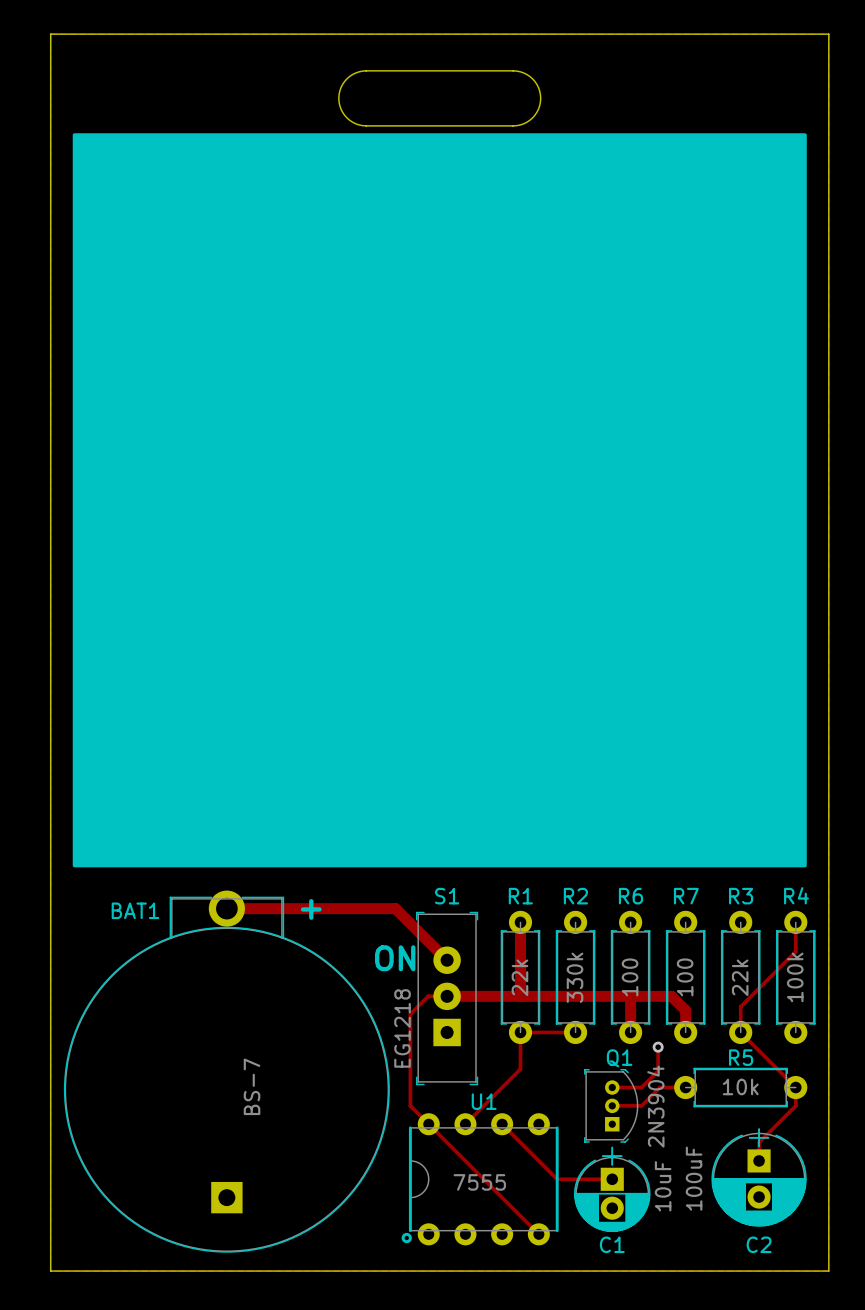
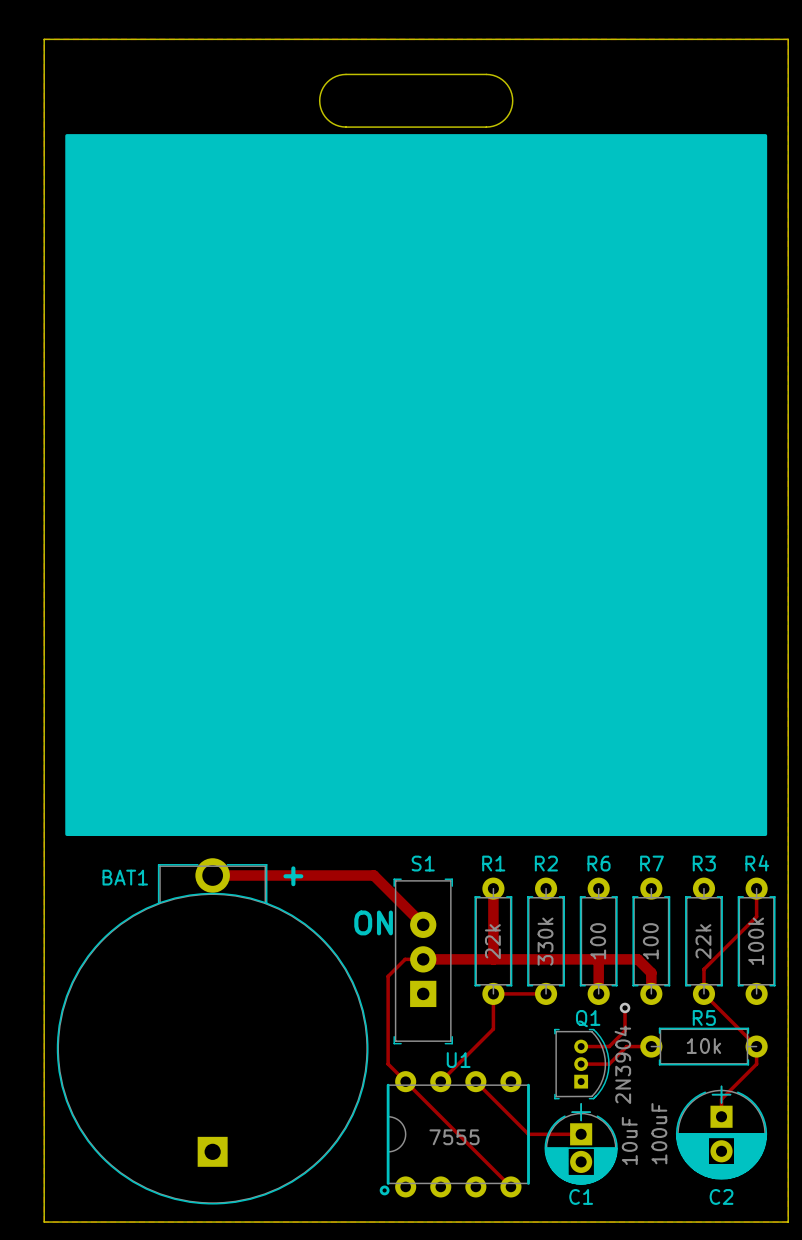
S1 value: EG1218 (402, 1028) -> none
line: none -> (596, 1032) (606, 1047) (608, 1065) (604, 1083) (594, 1098)
BAT1 value: BS-7 (252, 1086) -> none

